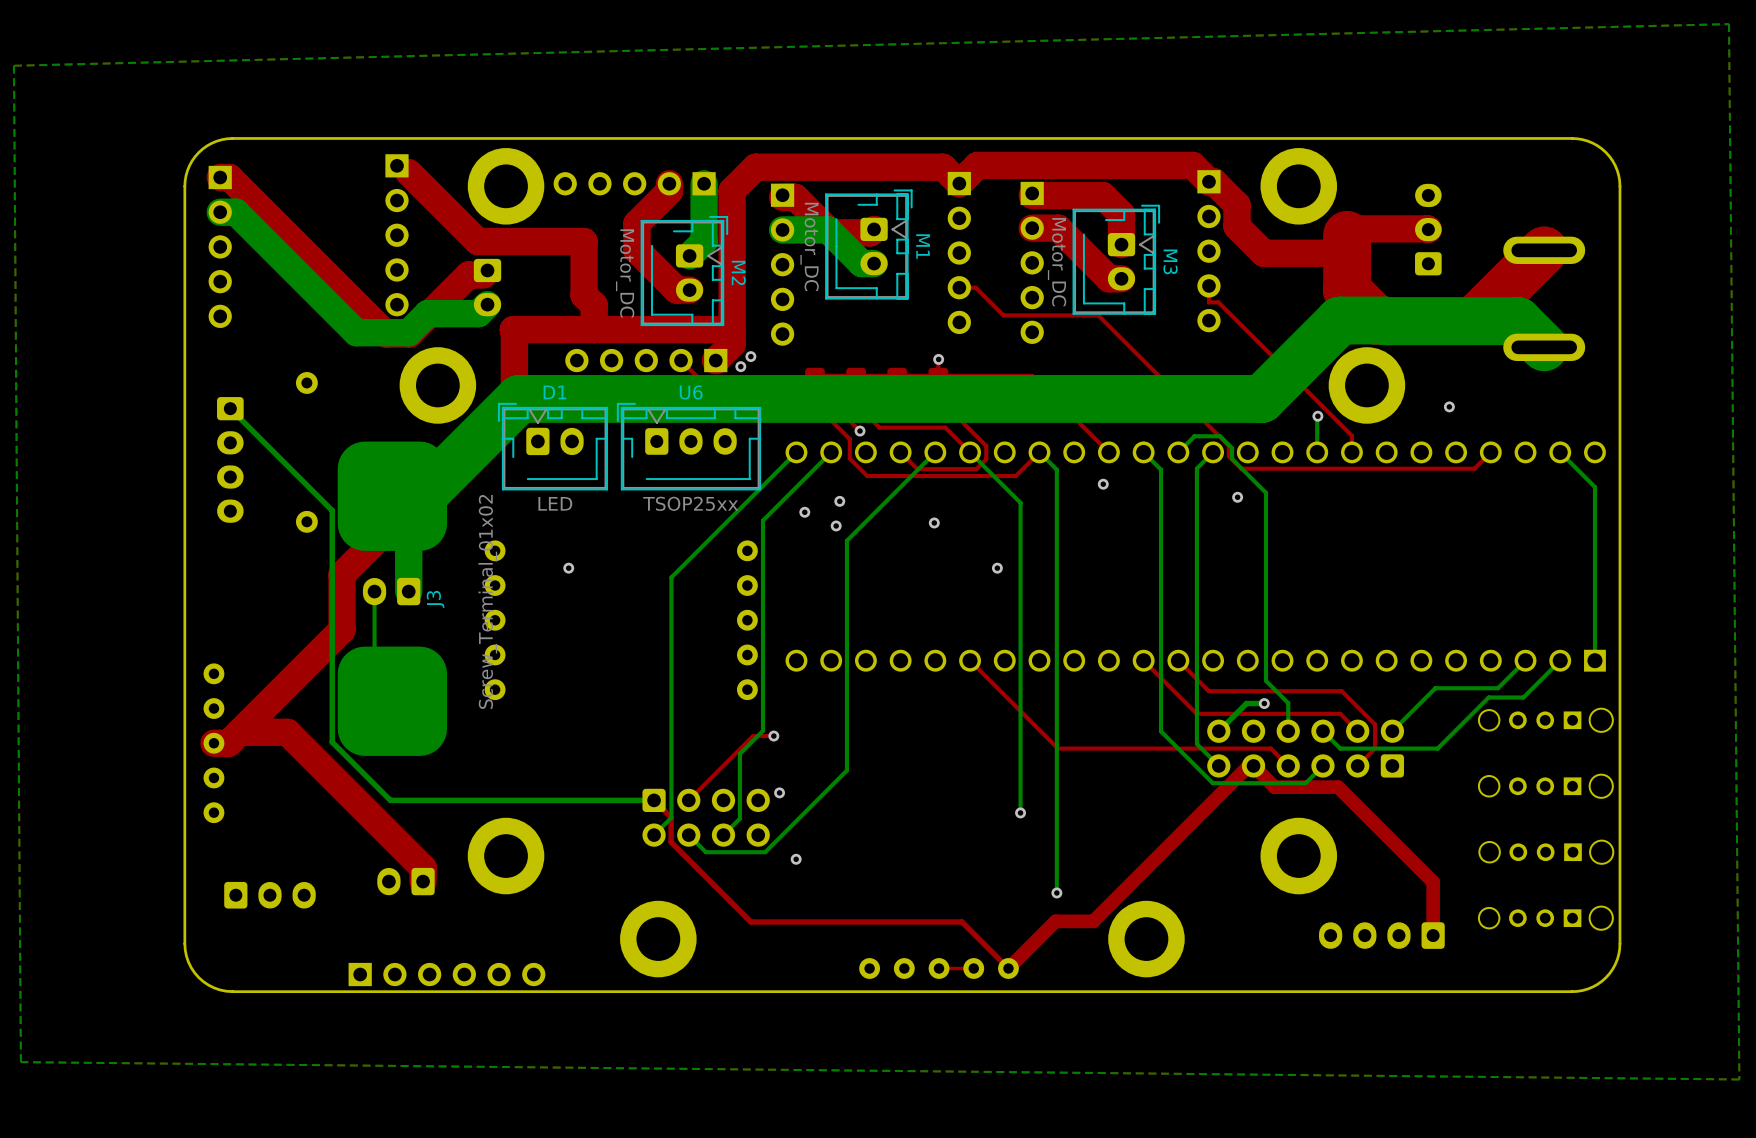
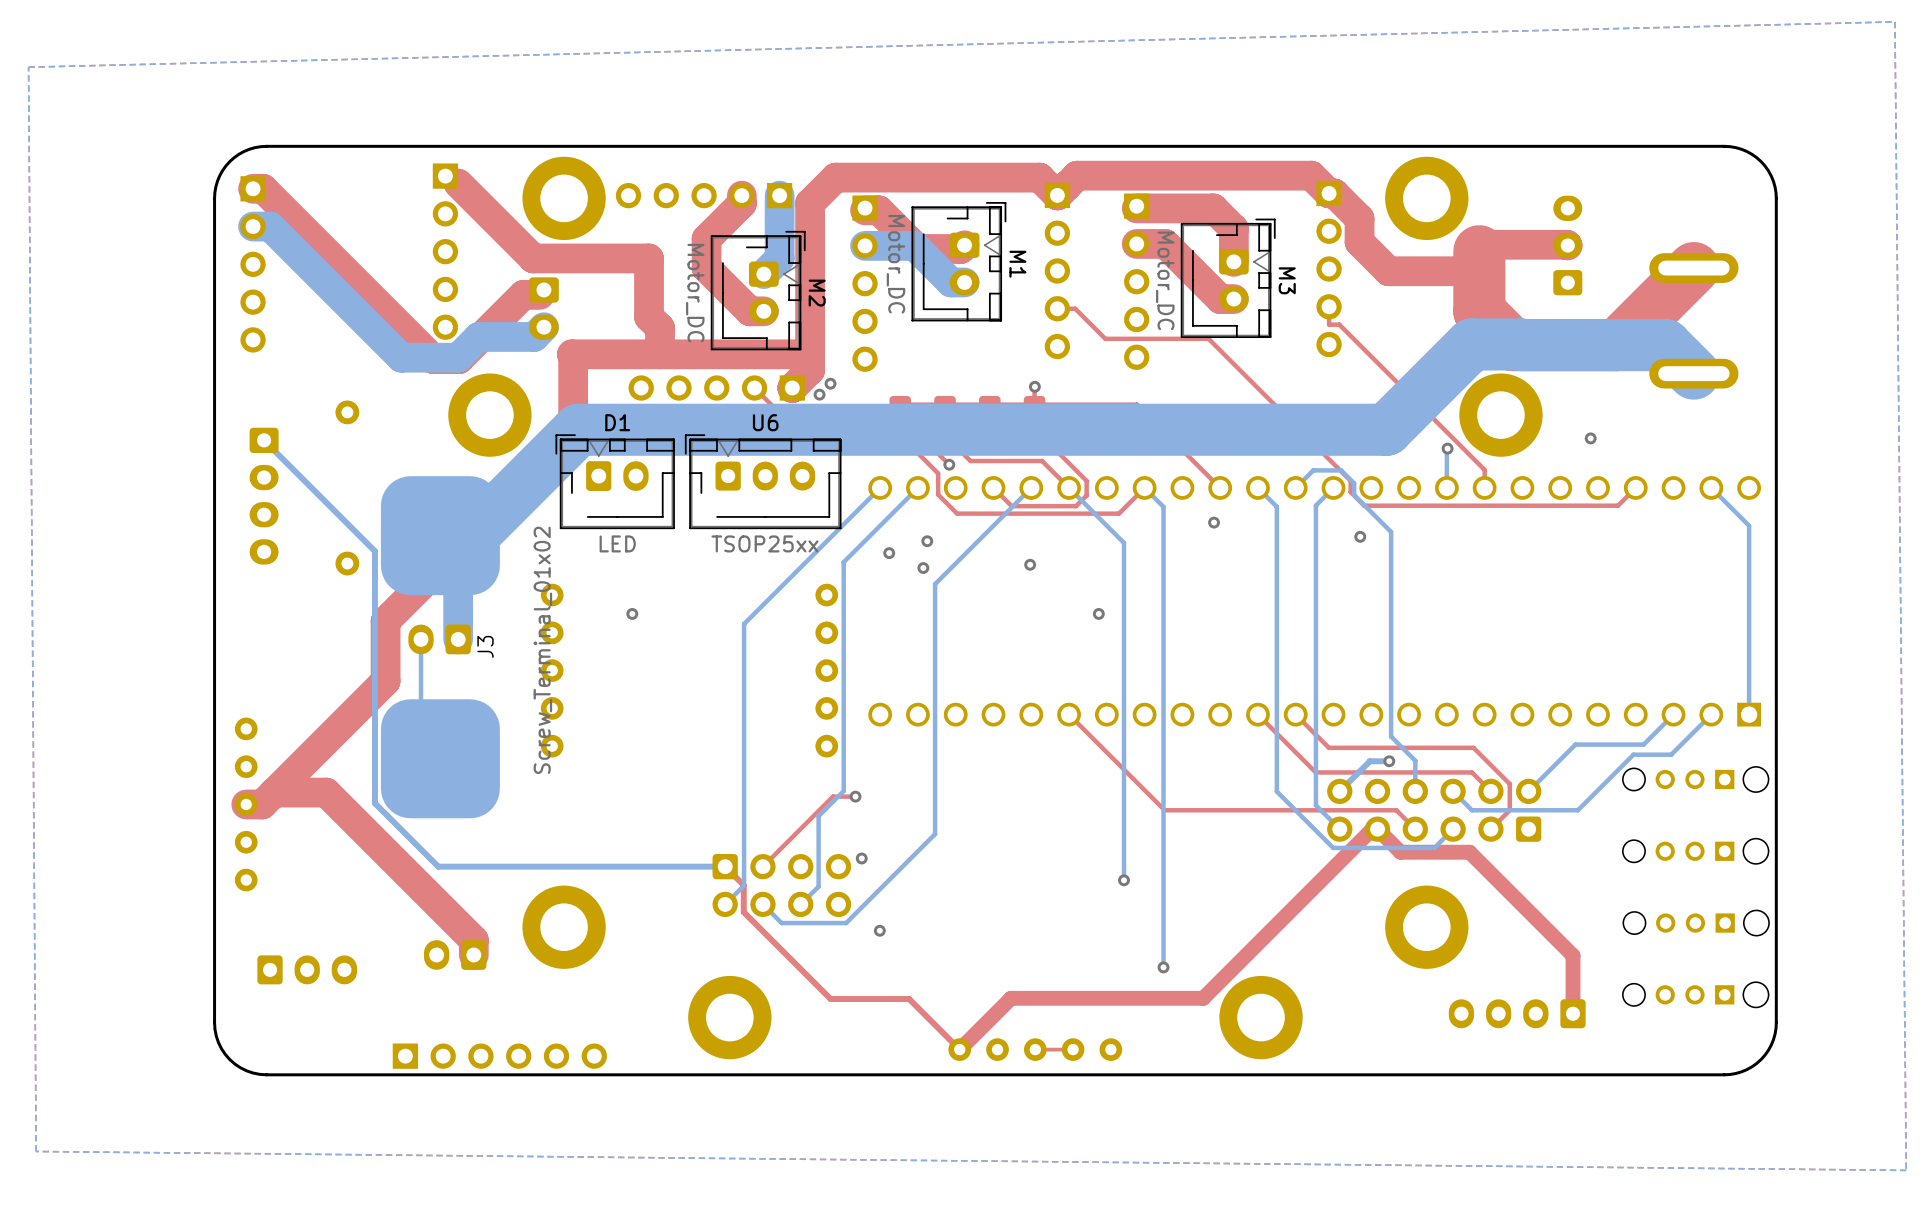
top track: (1055, 921) (1008, 968) (962, 922) (823, 922) -> (1162, 998) (1011, 998) (959, 1049) (909, 999)

